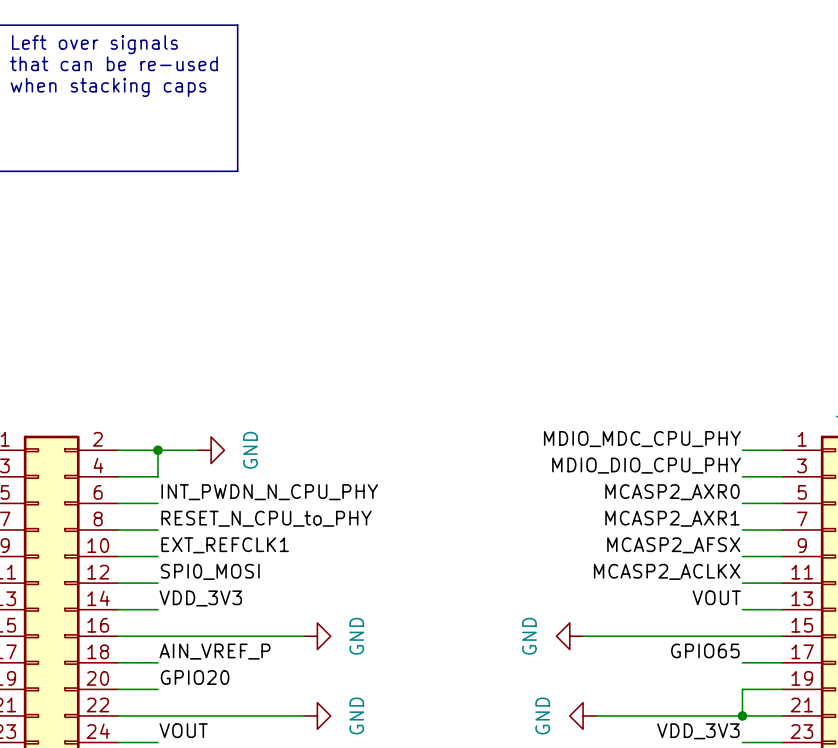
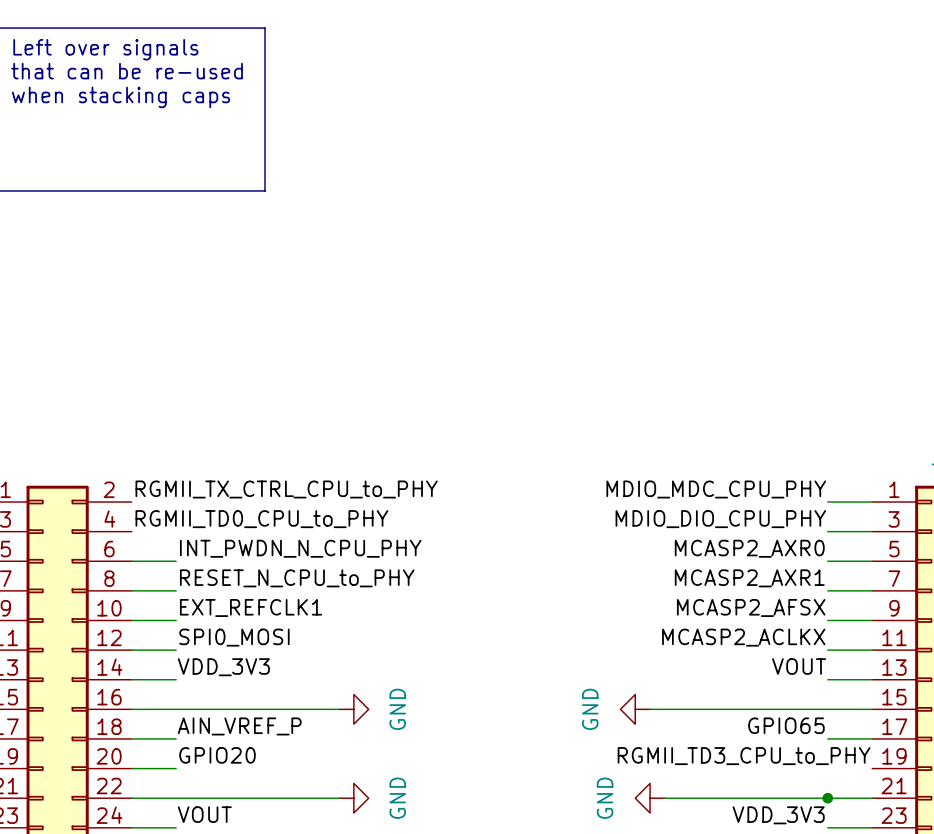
label: none -> RGMII_TX_CTRL_CPU_to_PHY (286, 489)
wire: (118, 450) (197, 450) -> none
wire: (157, 450) (157, 476) (118, 476) -> none
junction: (157, 450) -> none
power symbol: GND (211, 450) -> none
label: none -> RGMII_TD0_CPU_to_PHY (261, 519)
label: none -> RGMII_TD3_CPU_to_PHY (744, 756)
wire: (782, 689) (742, 689) (742, 715) -> none

